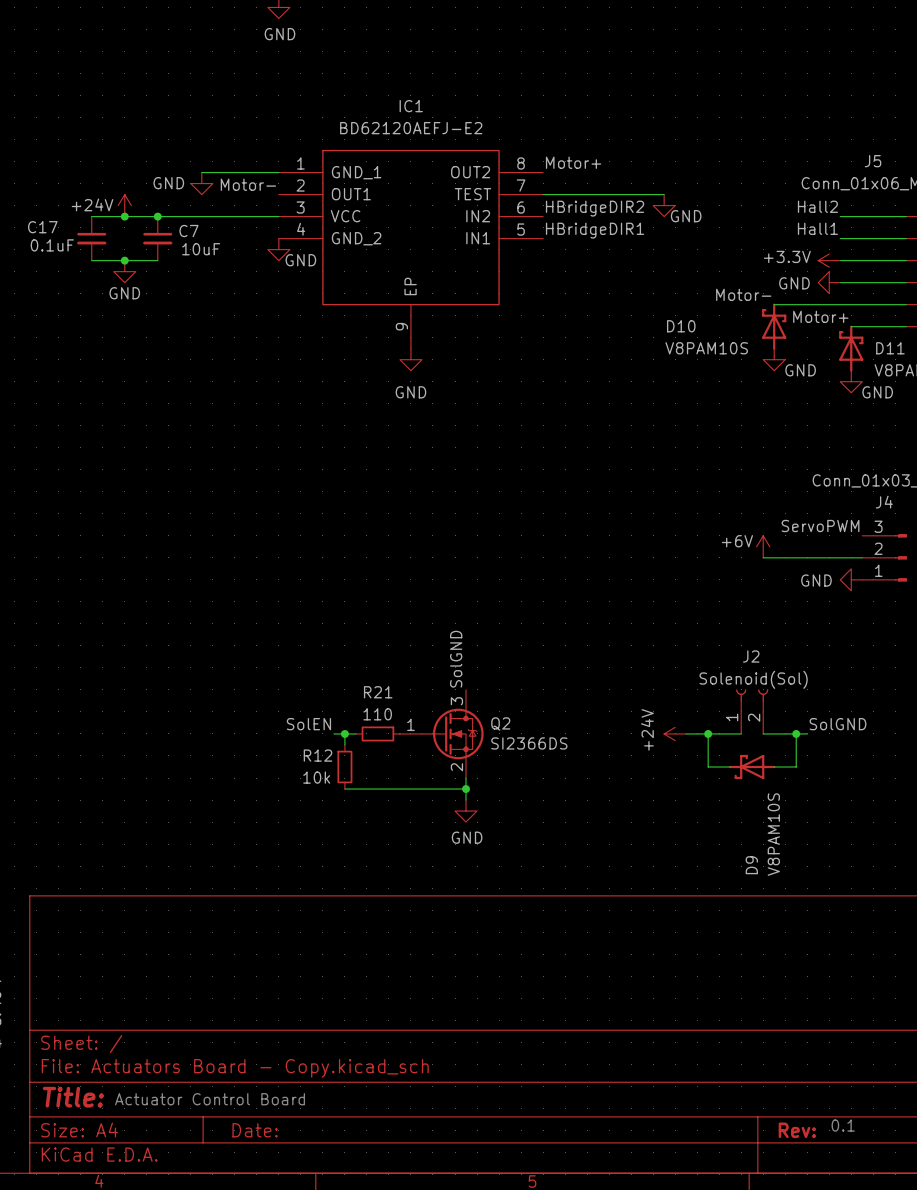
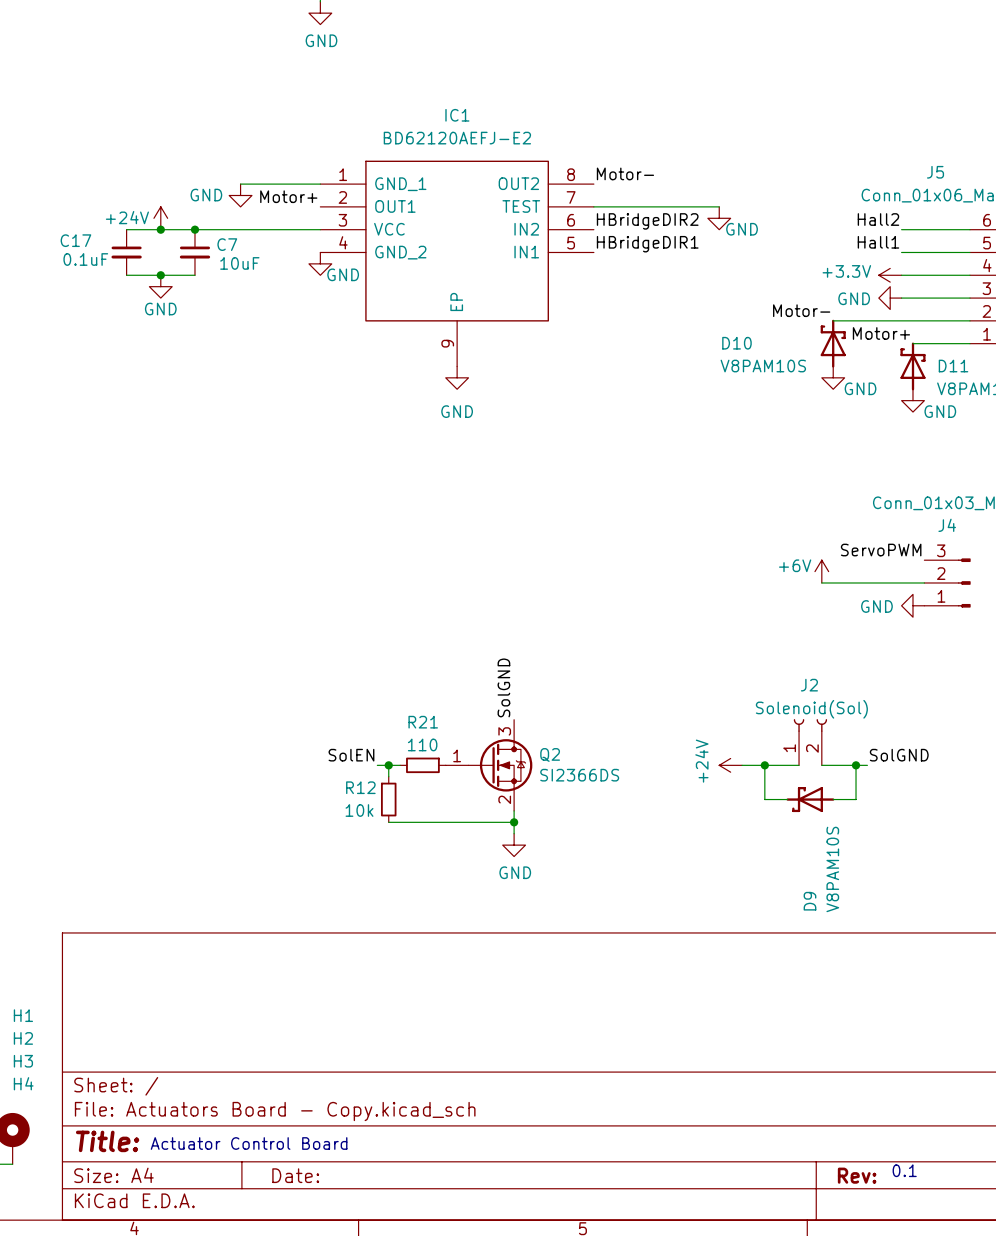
label: Motor+ (573, 162) -> Motor- (625, 173)
label: Motor- (248, 184) -> Motor+ (288, 196)

